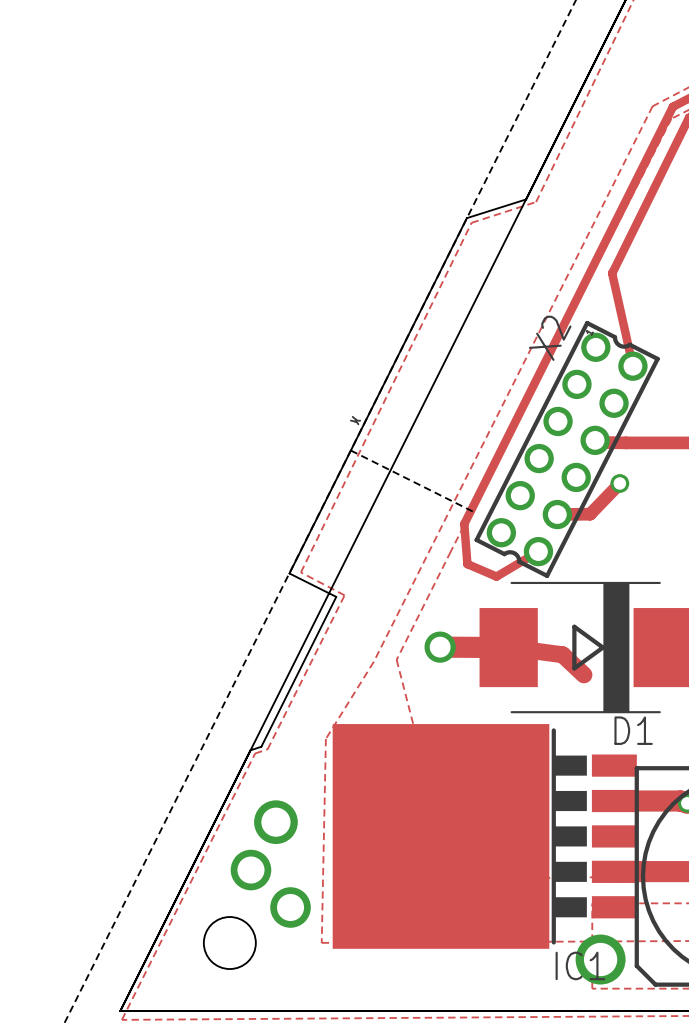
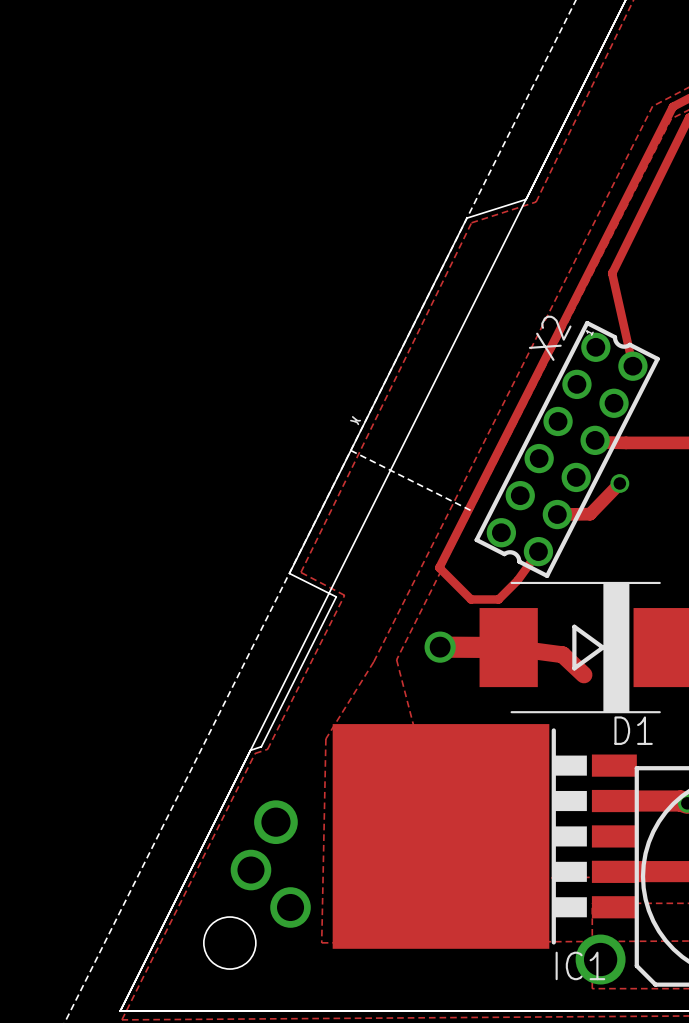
track: (672, 106) (464, 524) (467, 564) (496, 576) (538, 551) -> (672, 106) (439, 567) (471, 599) (498, 599) (517, 580) (538, 551)

